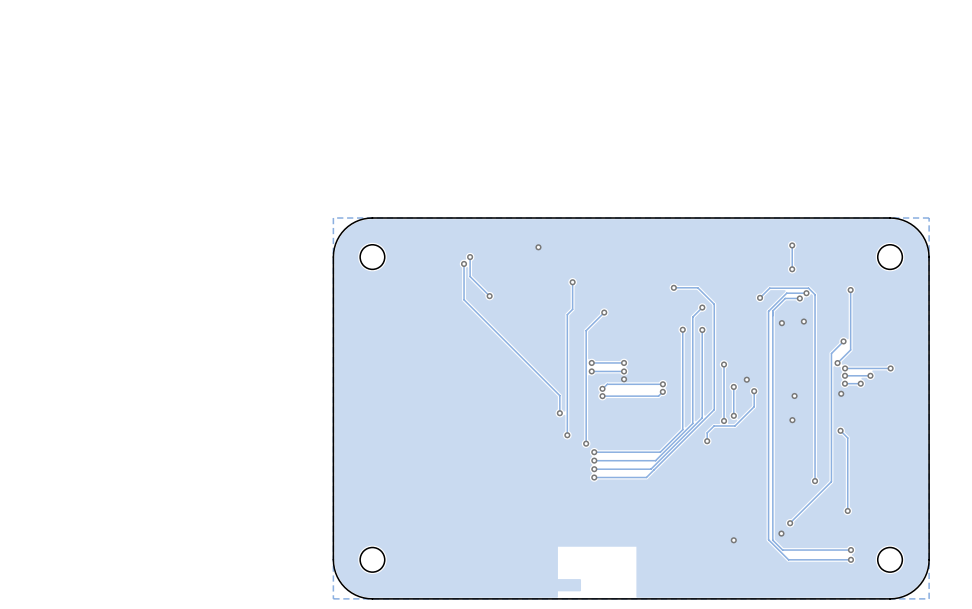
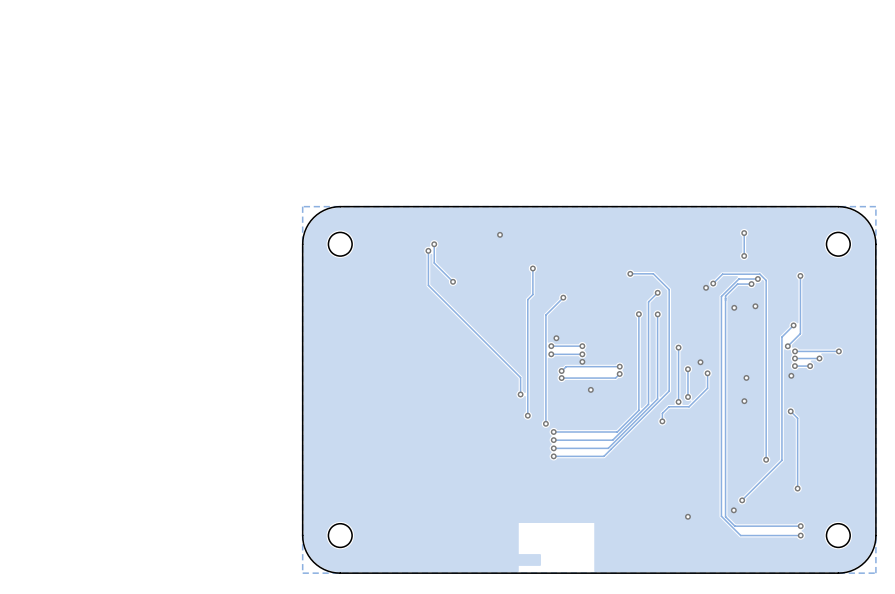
via: none -> (706, 287)
via: none -> (556, 338)
via: none -> (590, 389)

